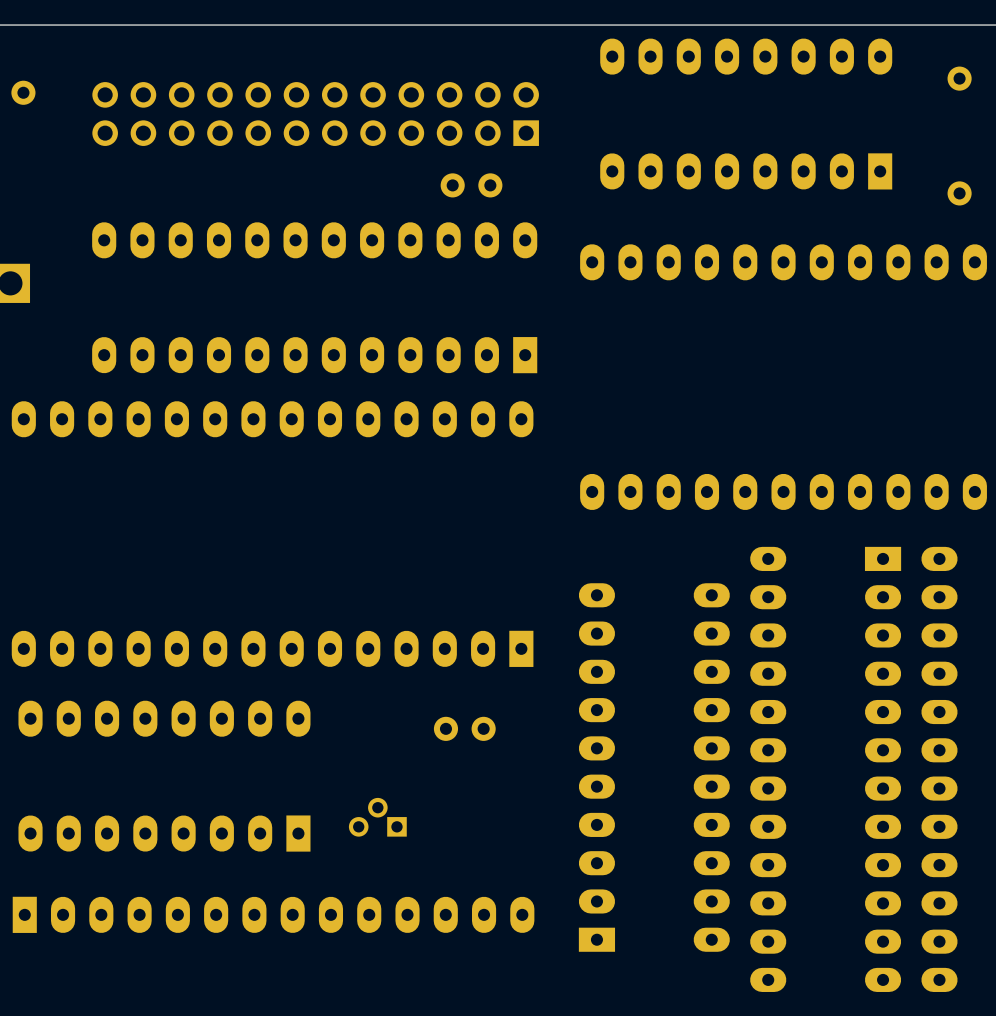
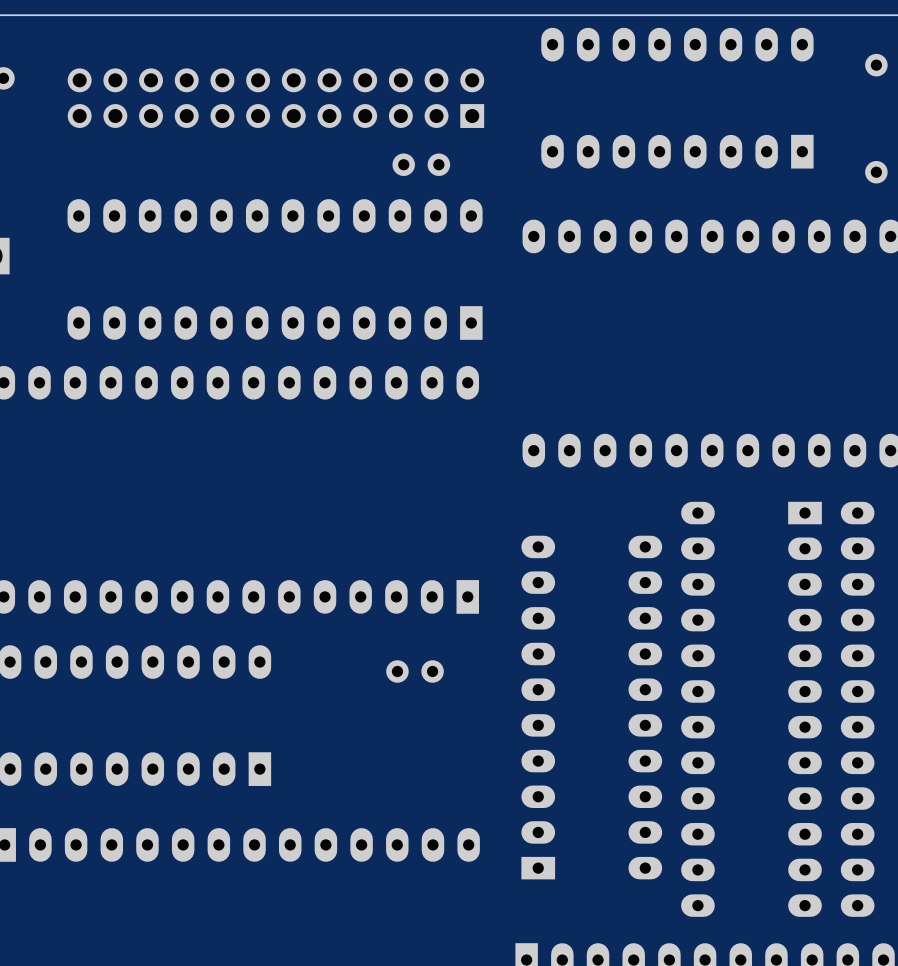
part: (377, 817) -> none

